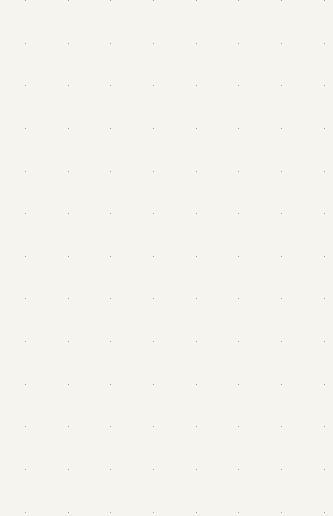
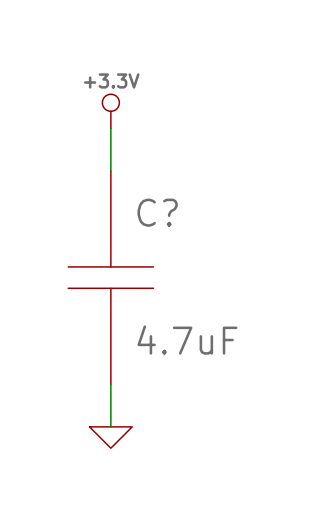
power symbol: none -> +3.3V (110, 111)
wire: none -> (110, 128) (110, 171)
C?: none -> 4.7uF (110, 277)
wire: none -> (110, 384) (110, 426)
power symbol: none -> (110, 437)

